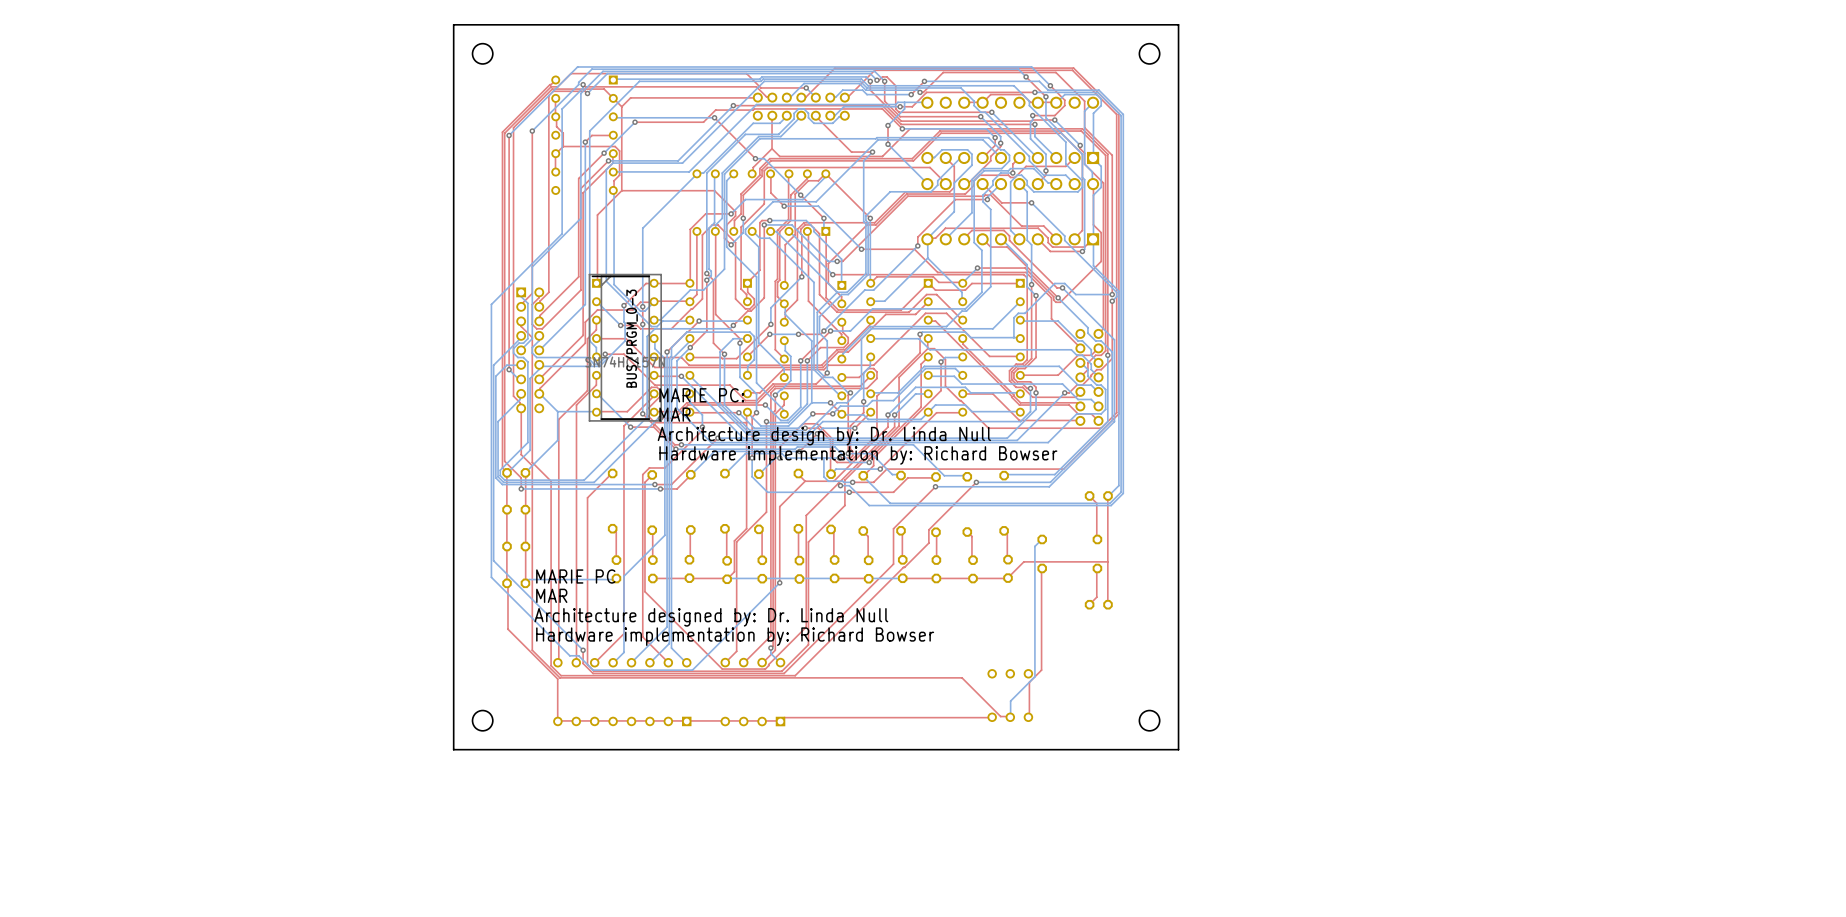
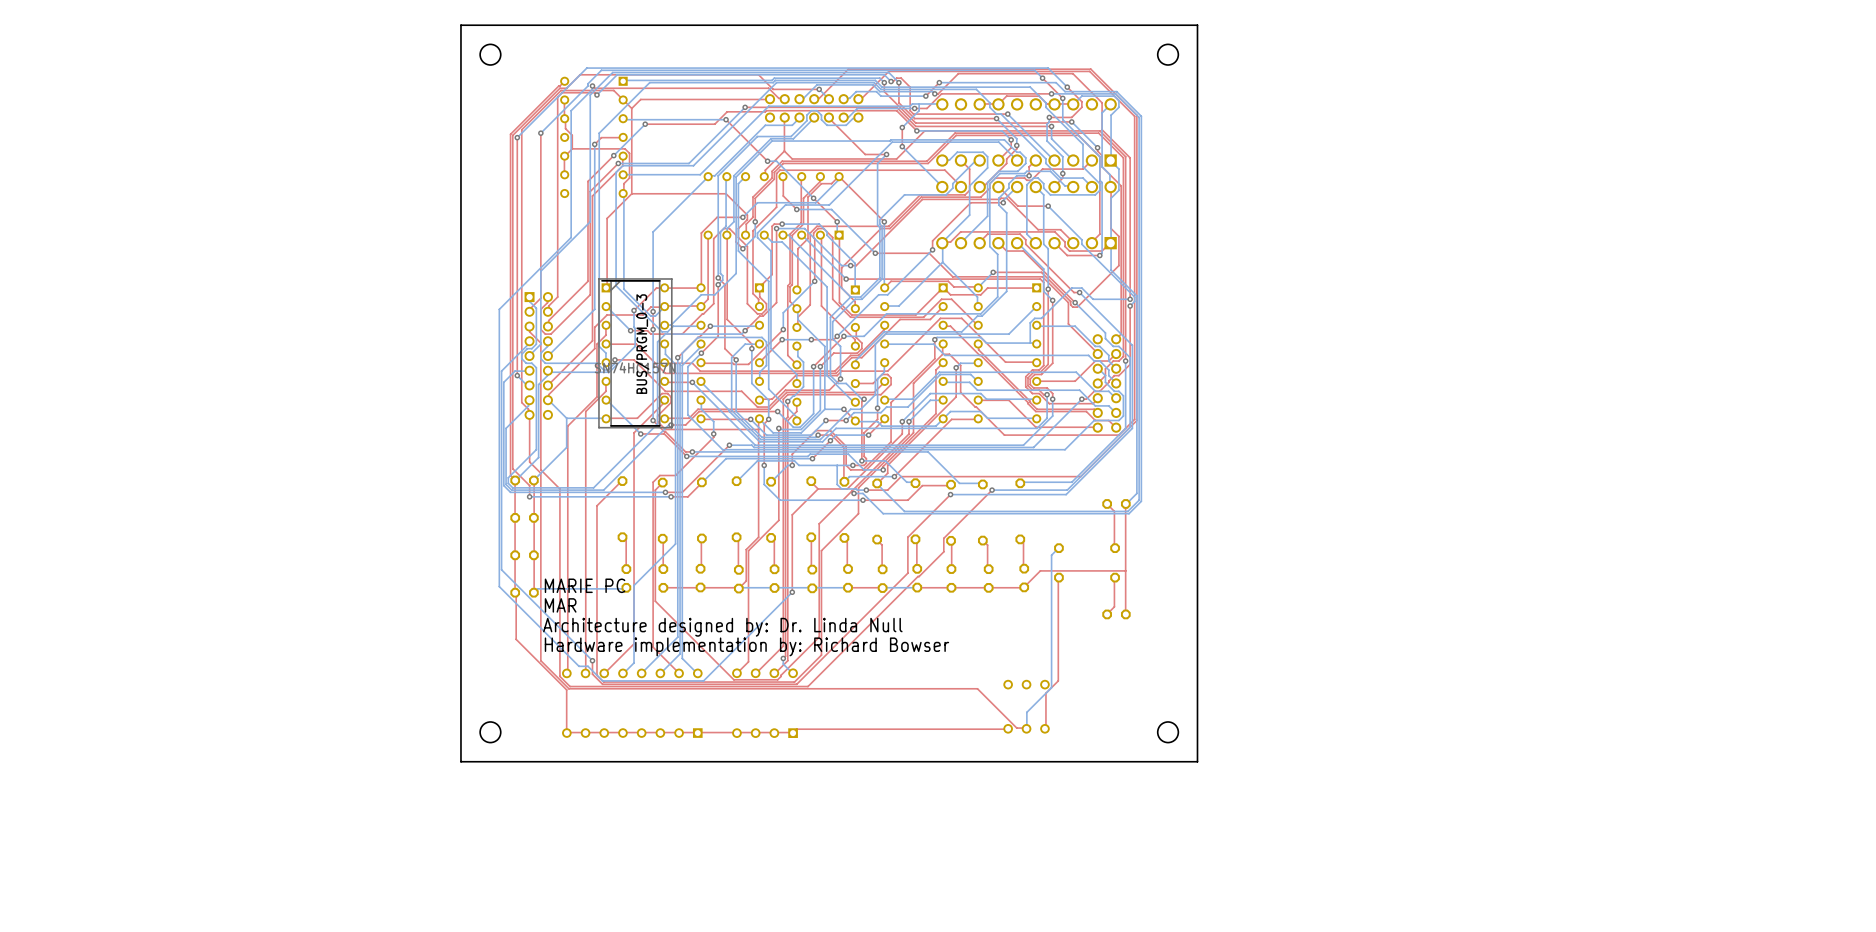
text: MARIE PC: (701, 395) -> none
text: MAR (674, 414) -> none
text: Architecture design by: Dr. Linda Null (824, 436) -> none
text: Hardware implementation by: Richard Bowser (858, 455) -> none

